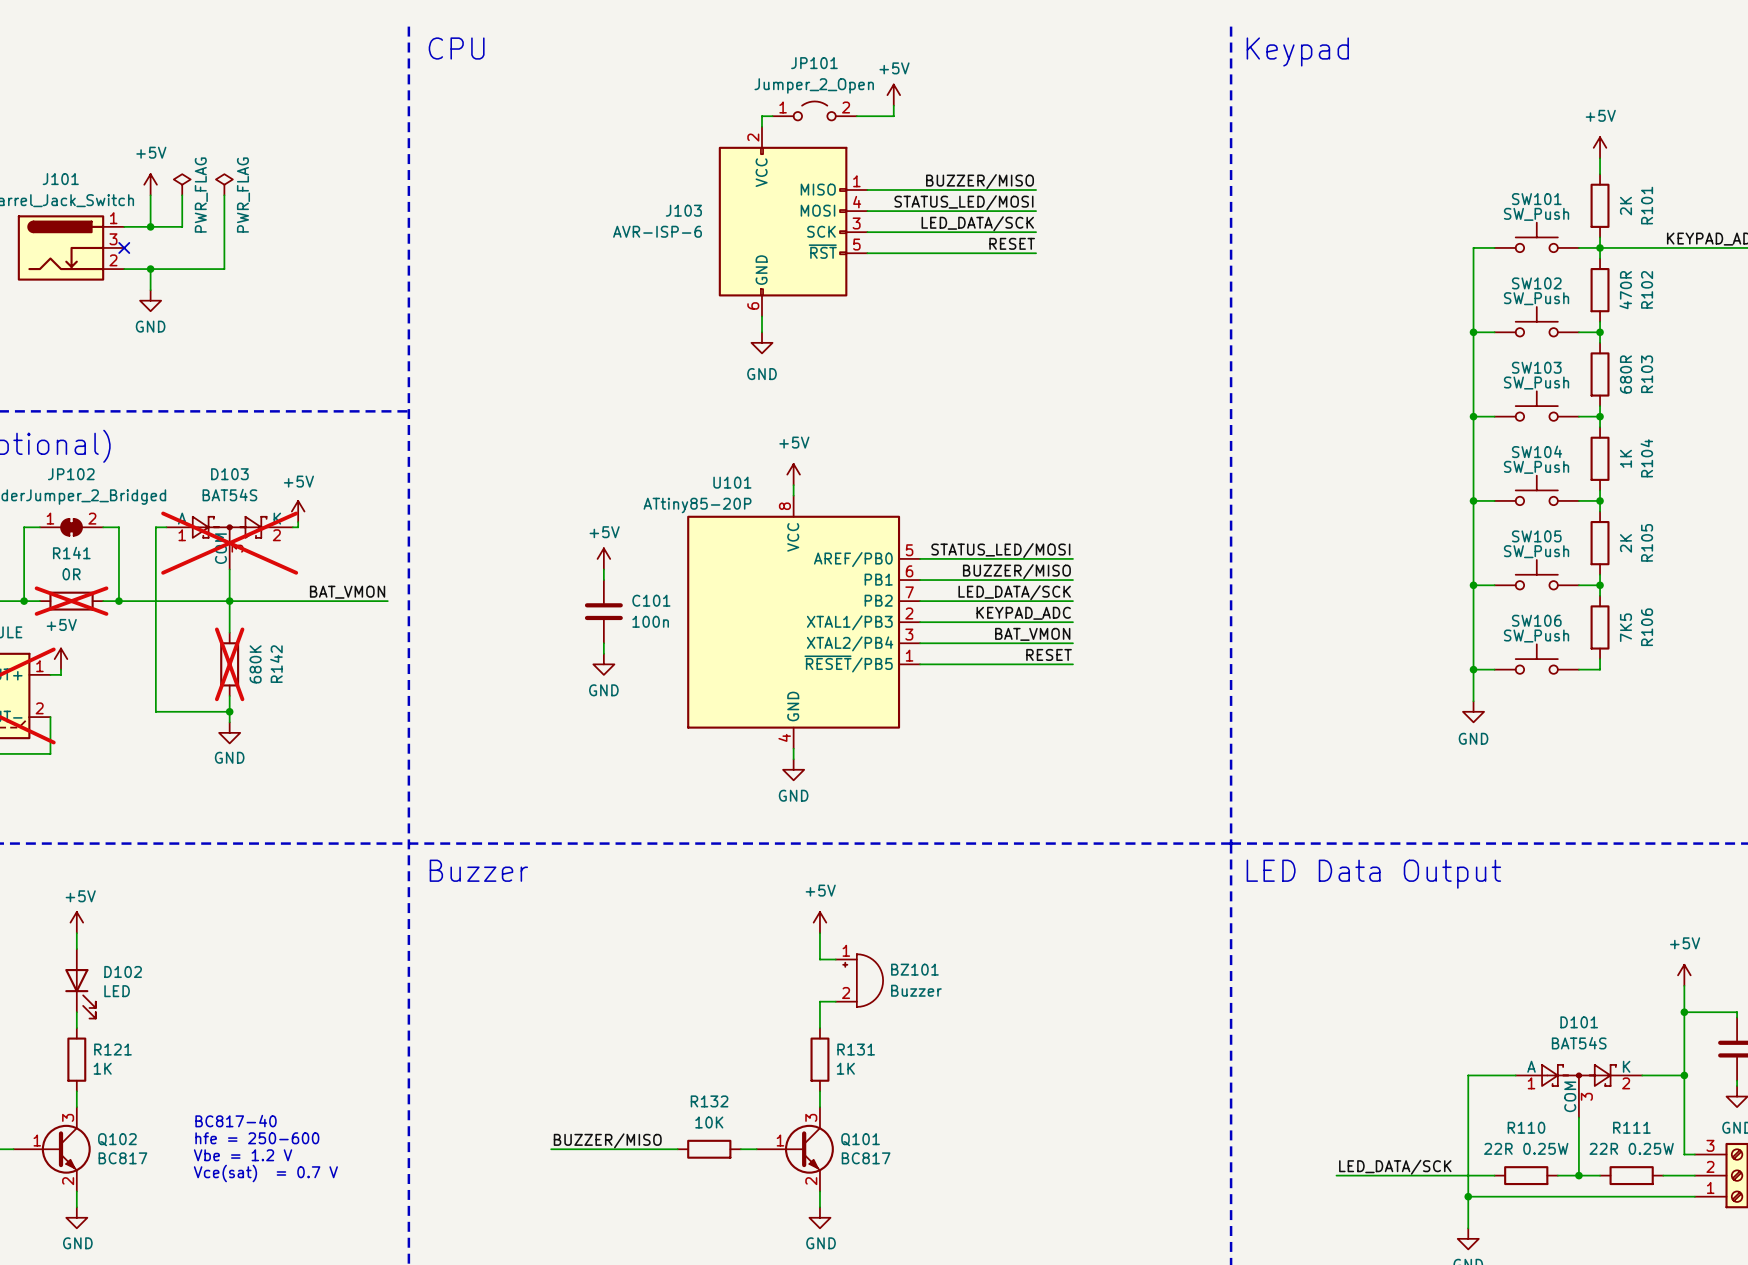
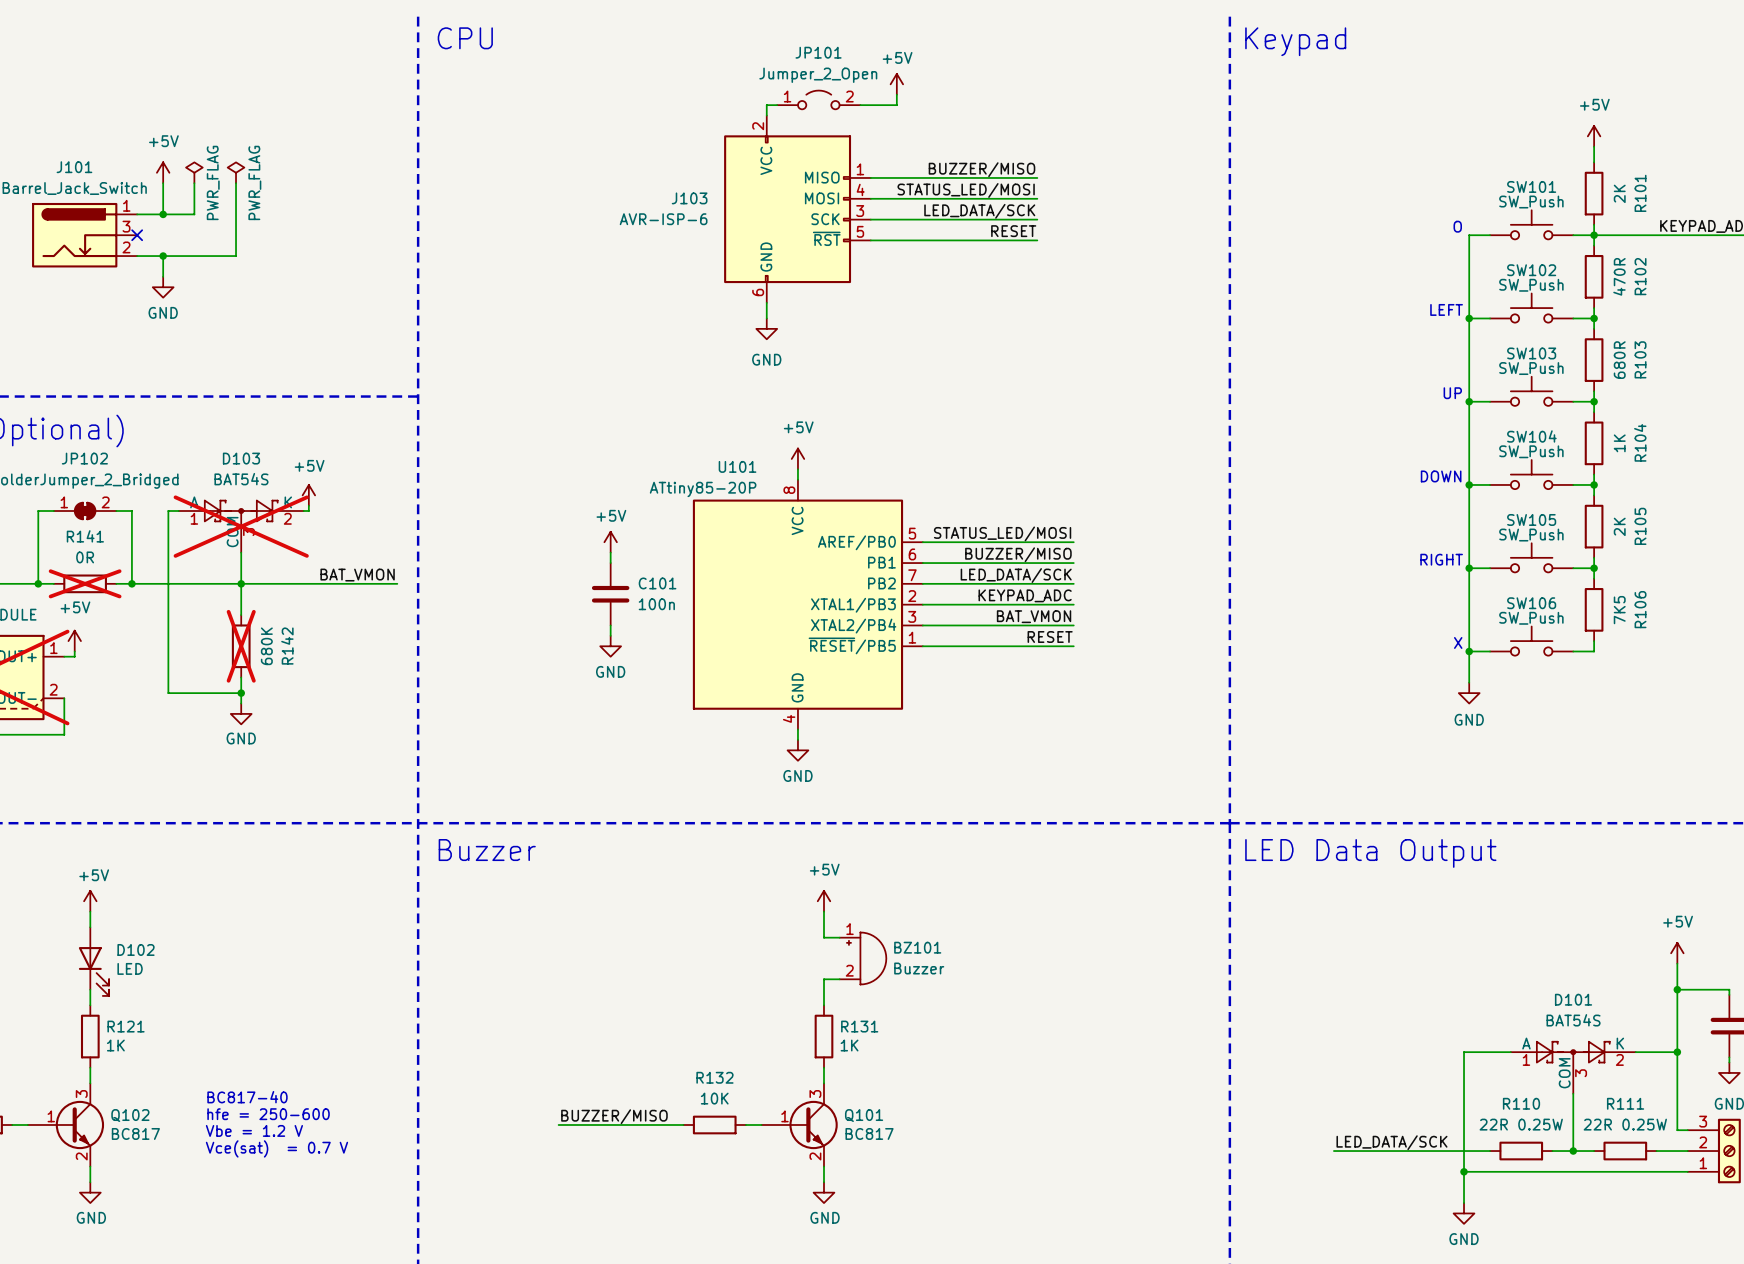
text: none -> O (1457, 226)
text: none -> LEFT (1446, 309)
text: none -> UP (1452, 393)
text: none -> DOWN (1441, 476)
text: none -> RIGHT (1441, 559)
text: none -> X (1458, 642)

